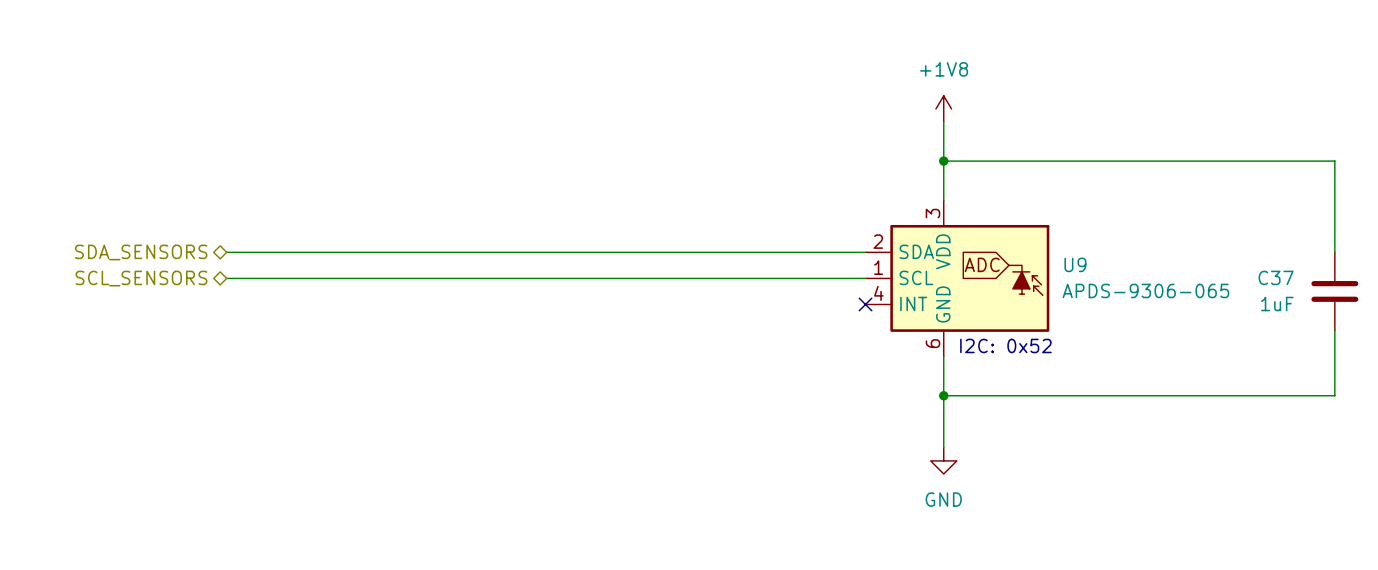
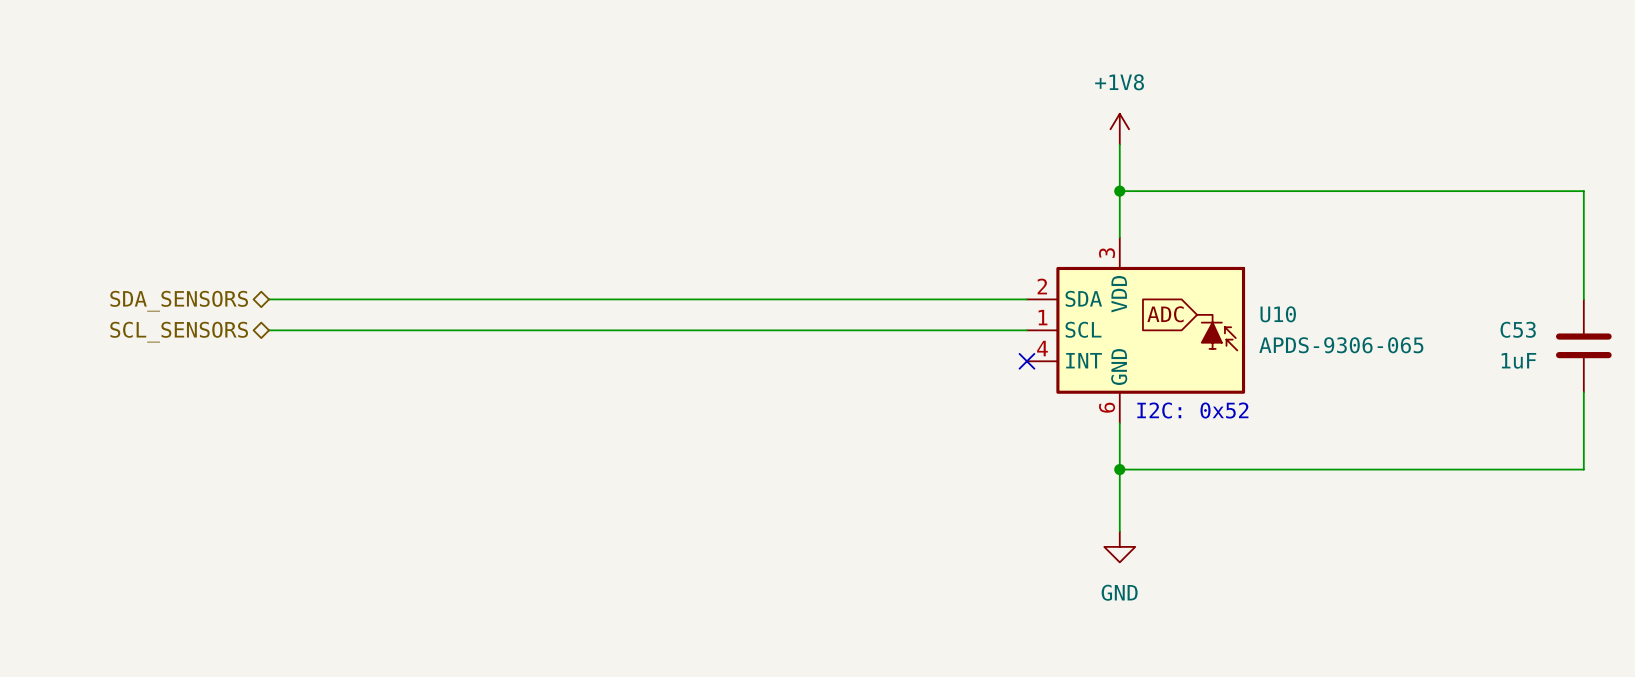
U9 name: U9 (1075, 264) -> U10 (1278, 314)
C37 name: C37 (1276, 277) -> C53 (1518, 329)

